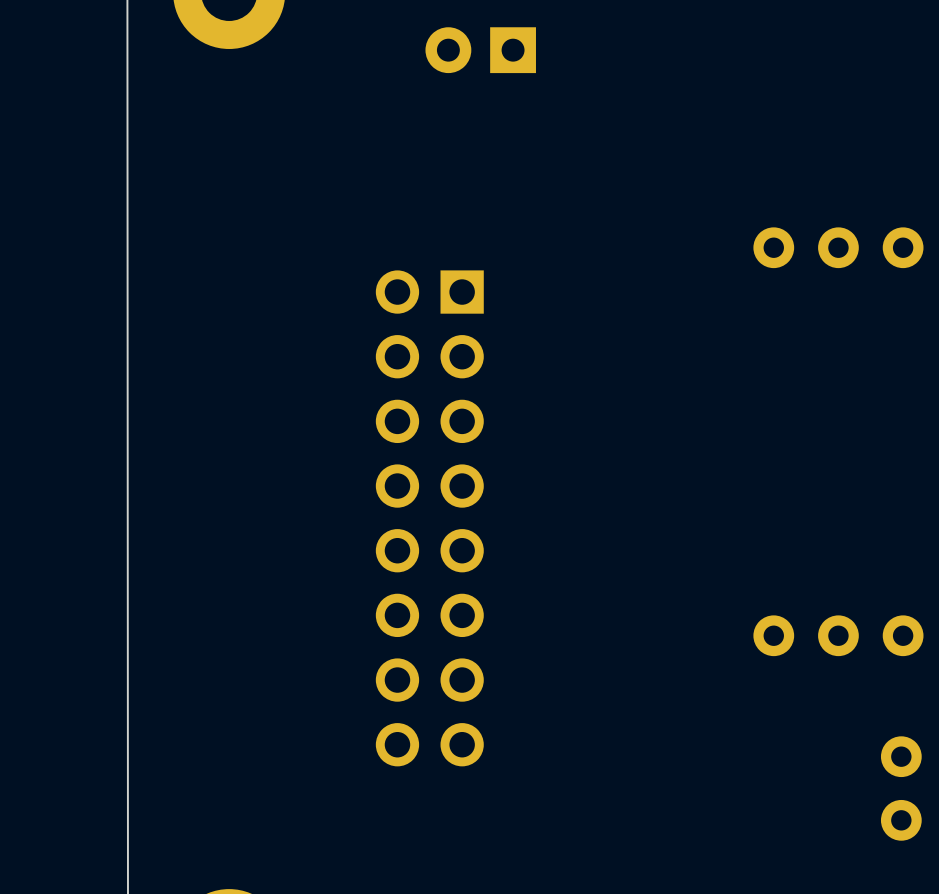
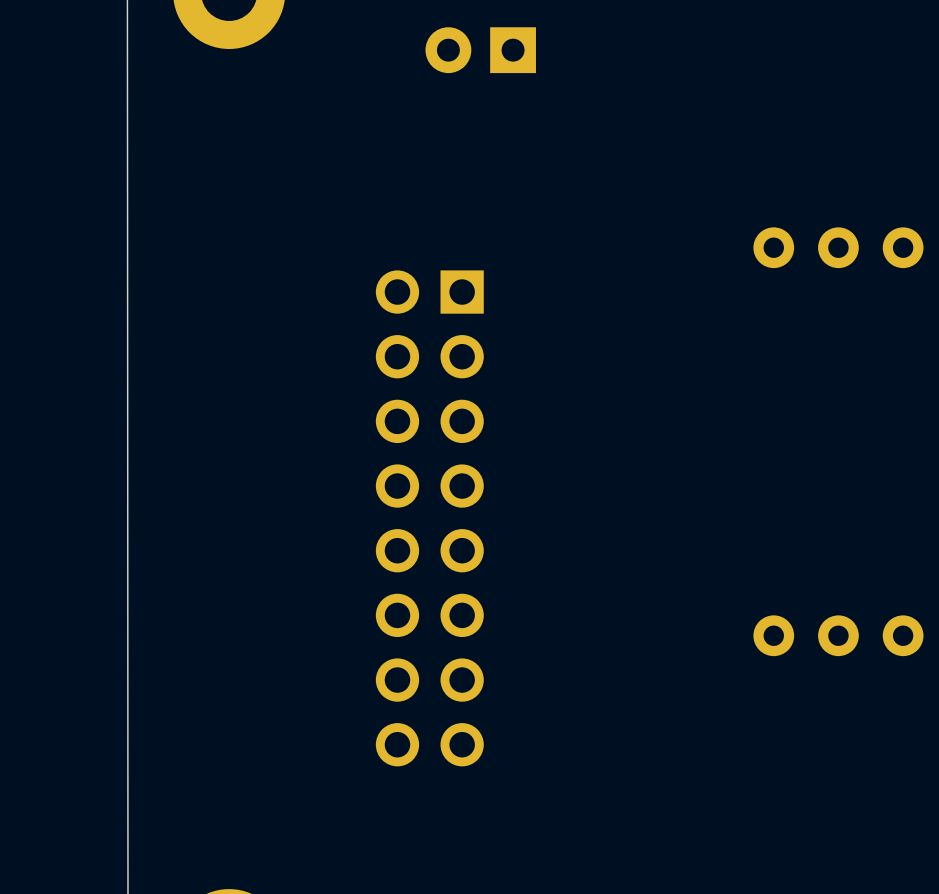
part: (901, 788) -> none

